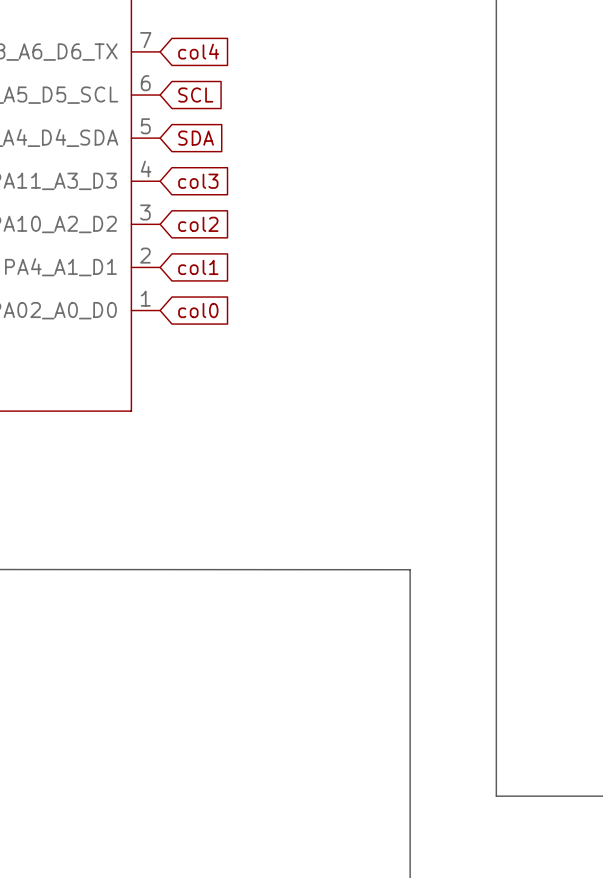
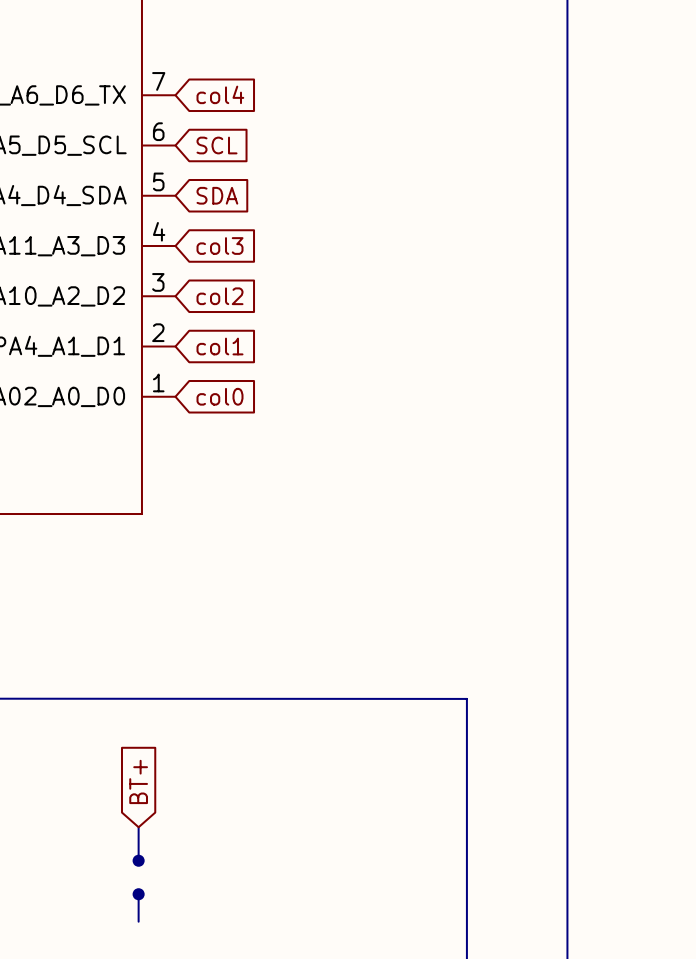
global label: none -> BT+ (138, 781)
wire: none -> (138, 827) (138, 860)
junction: none -> (138, 860)
wire: none -> (138, 894) (138, 921)
junction: none -> (138, 894)

